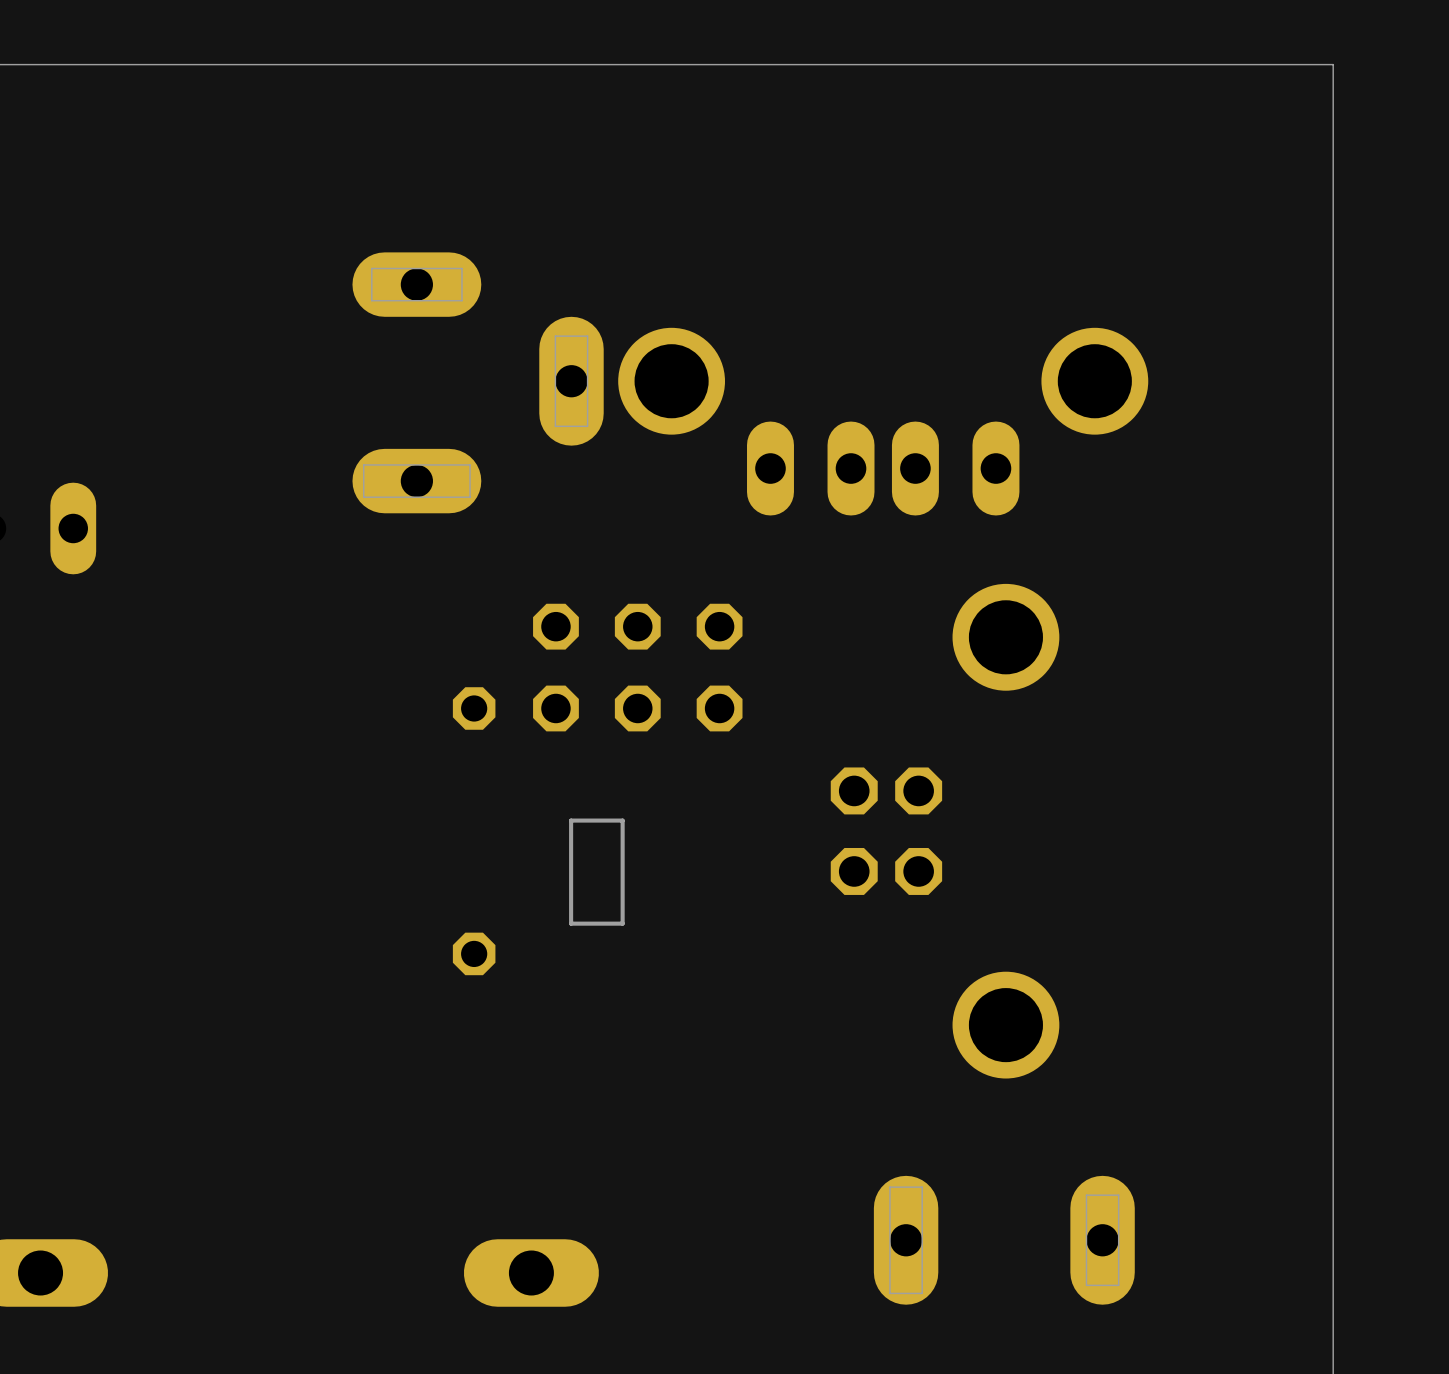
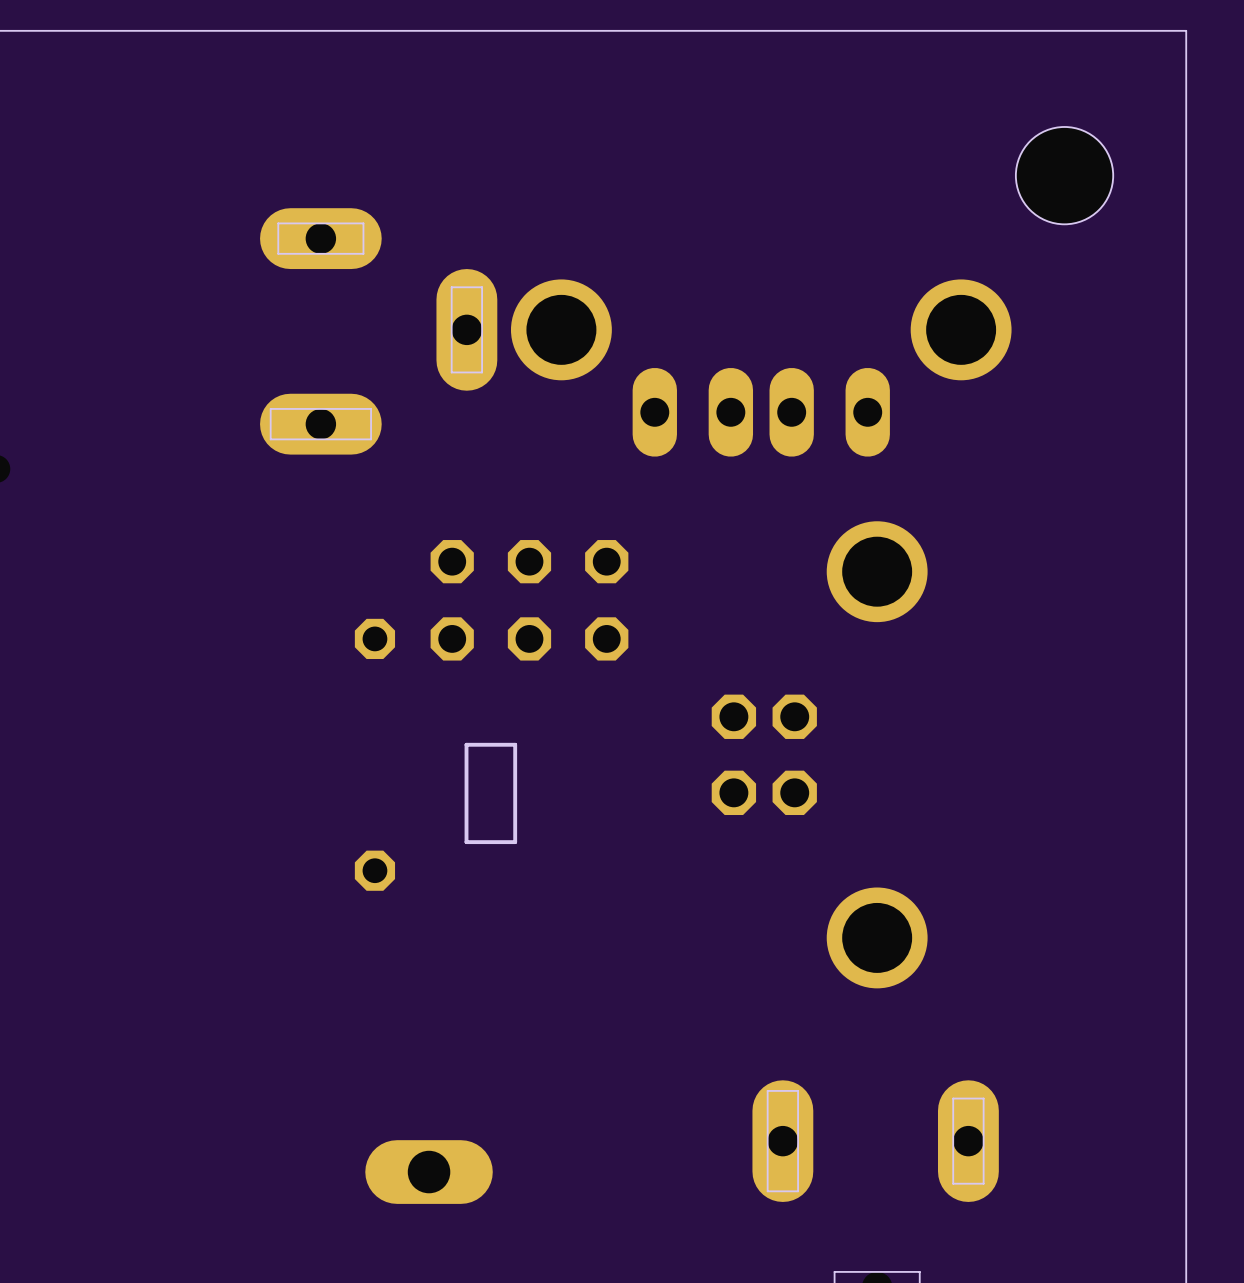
hole: none -> (1064, 175)

